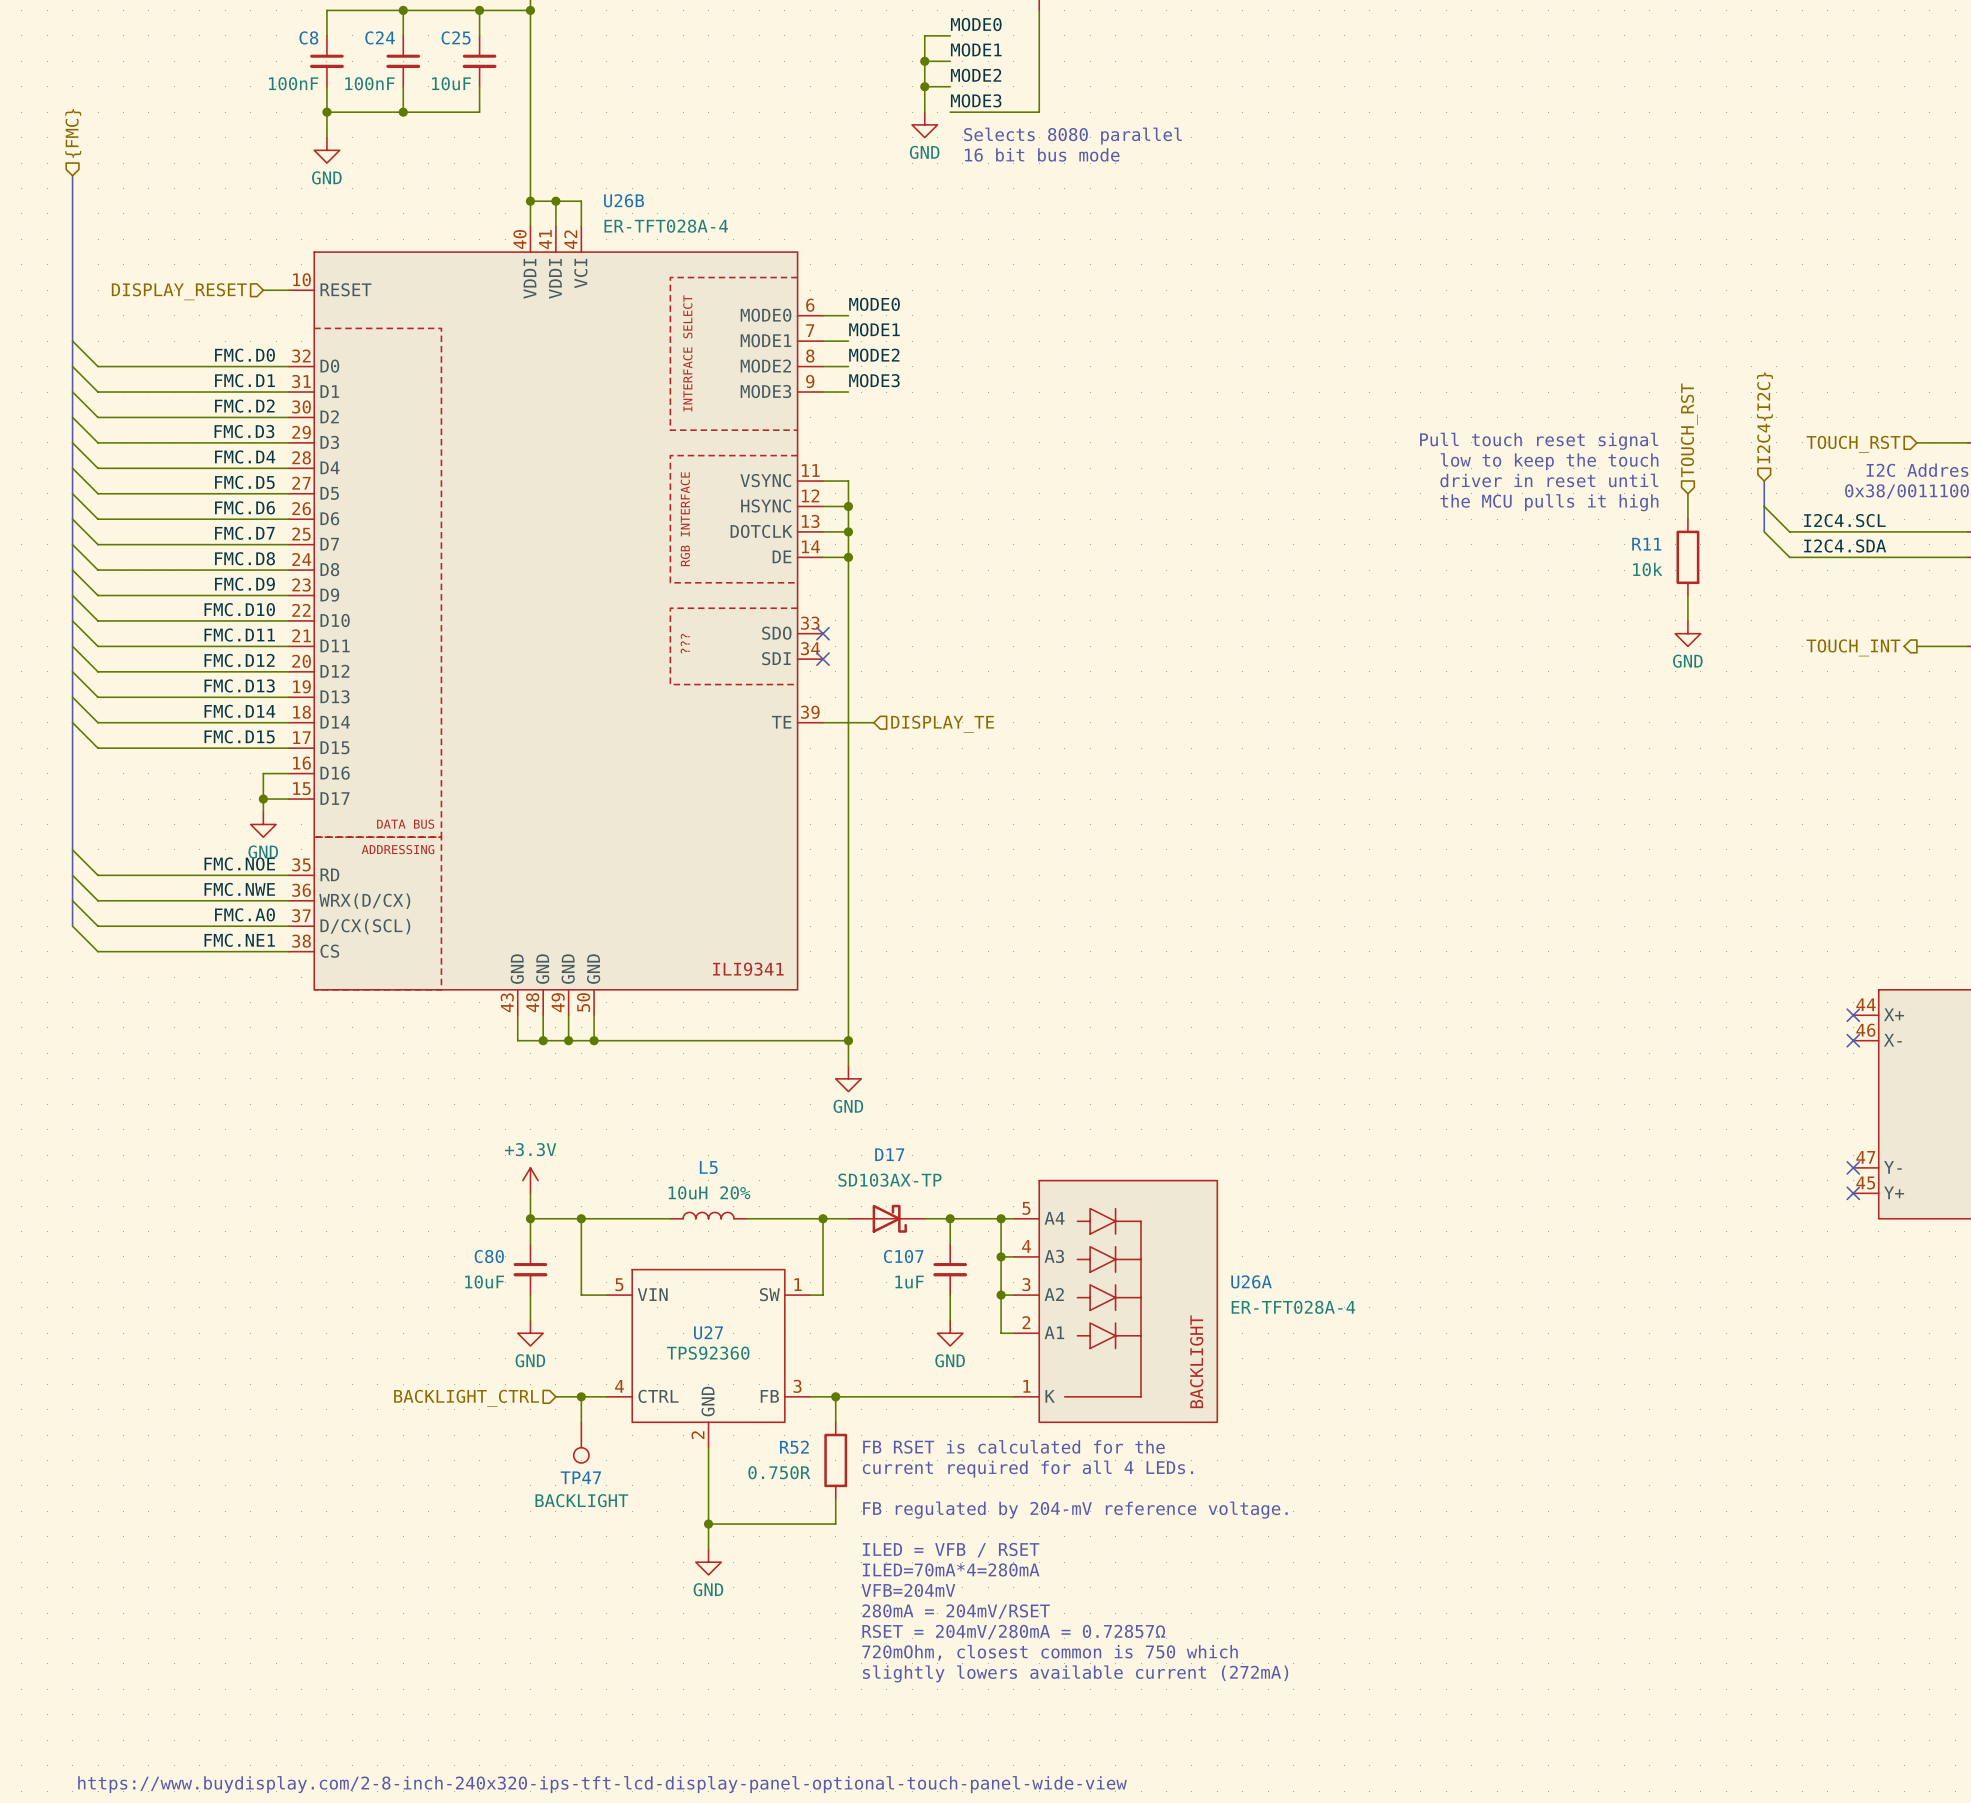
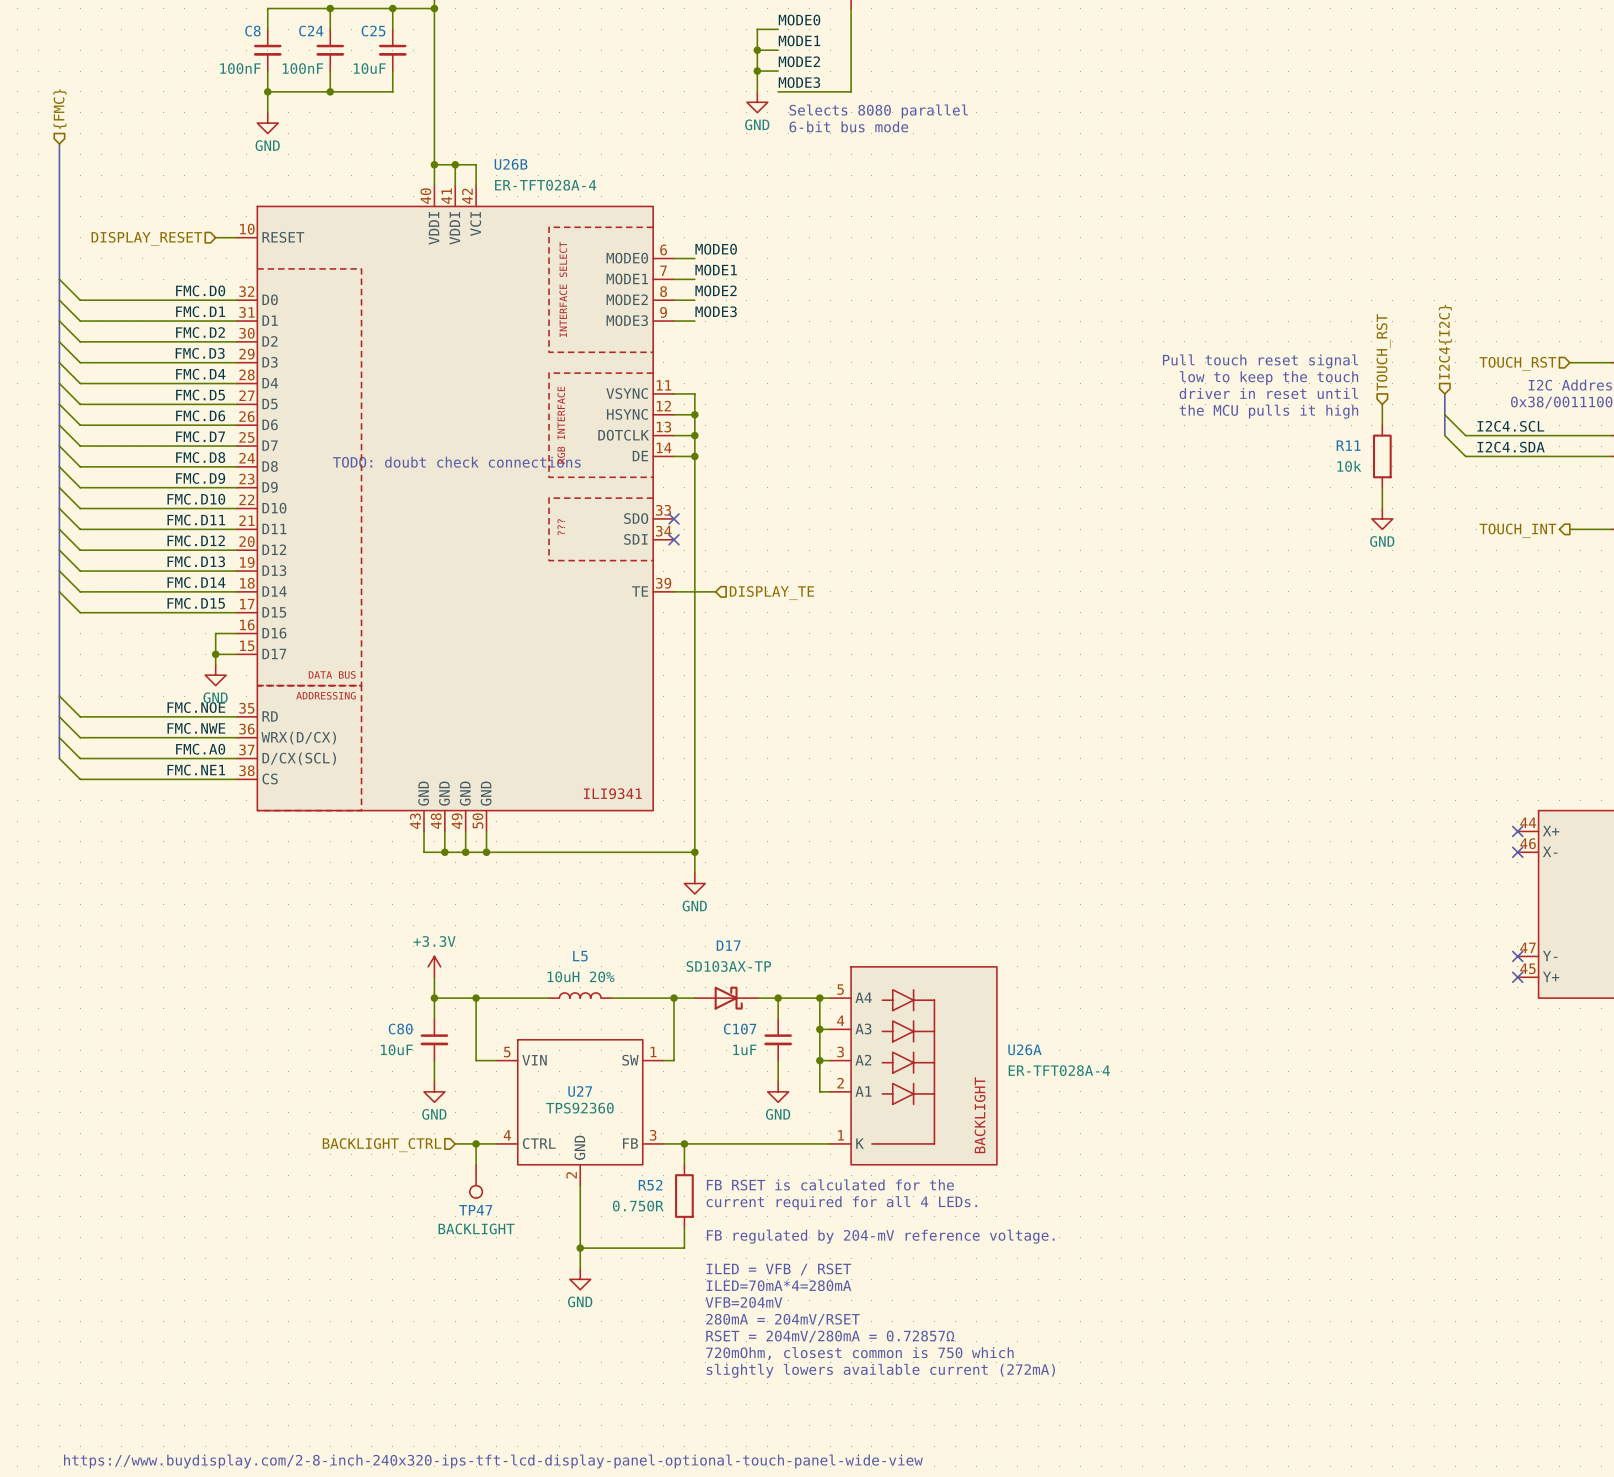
text: 16 bit bus mode (1042, 154) -> 6-bit bus mode (848, 126)
text: none -> TODO: doubt check connections (456, 462)

